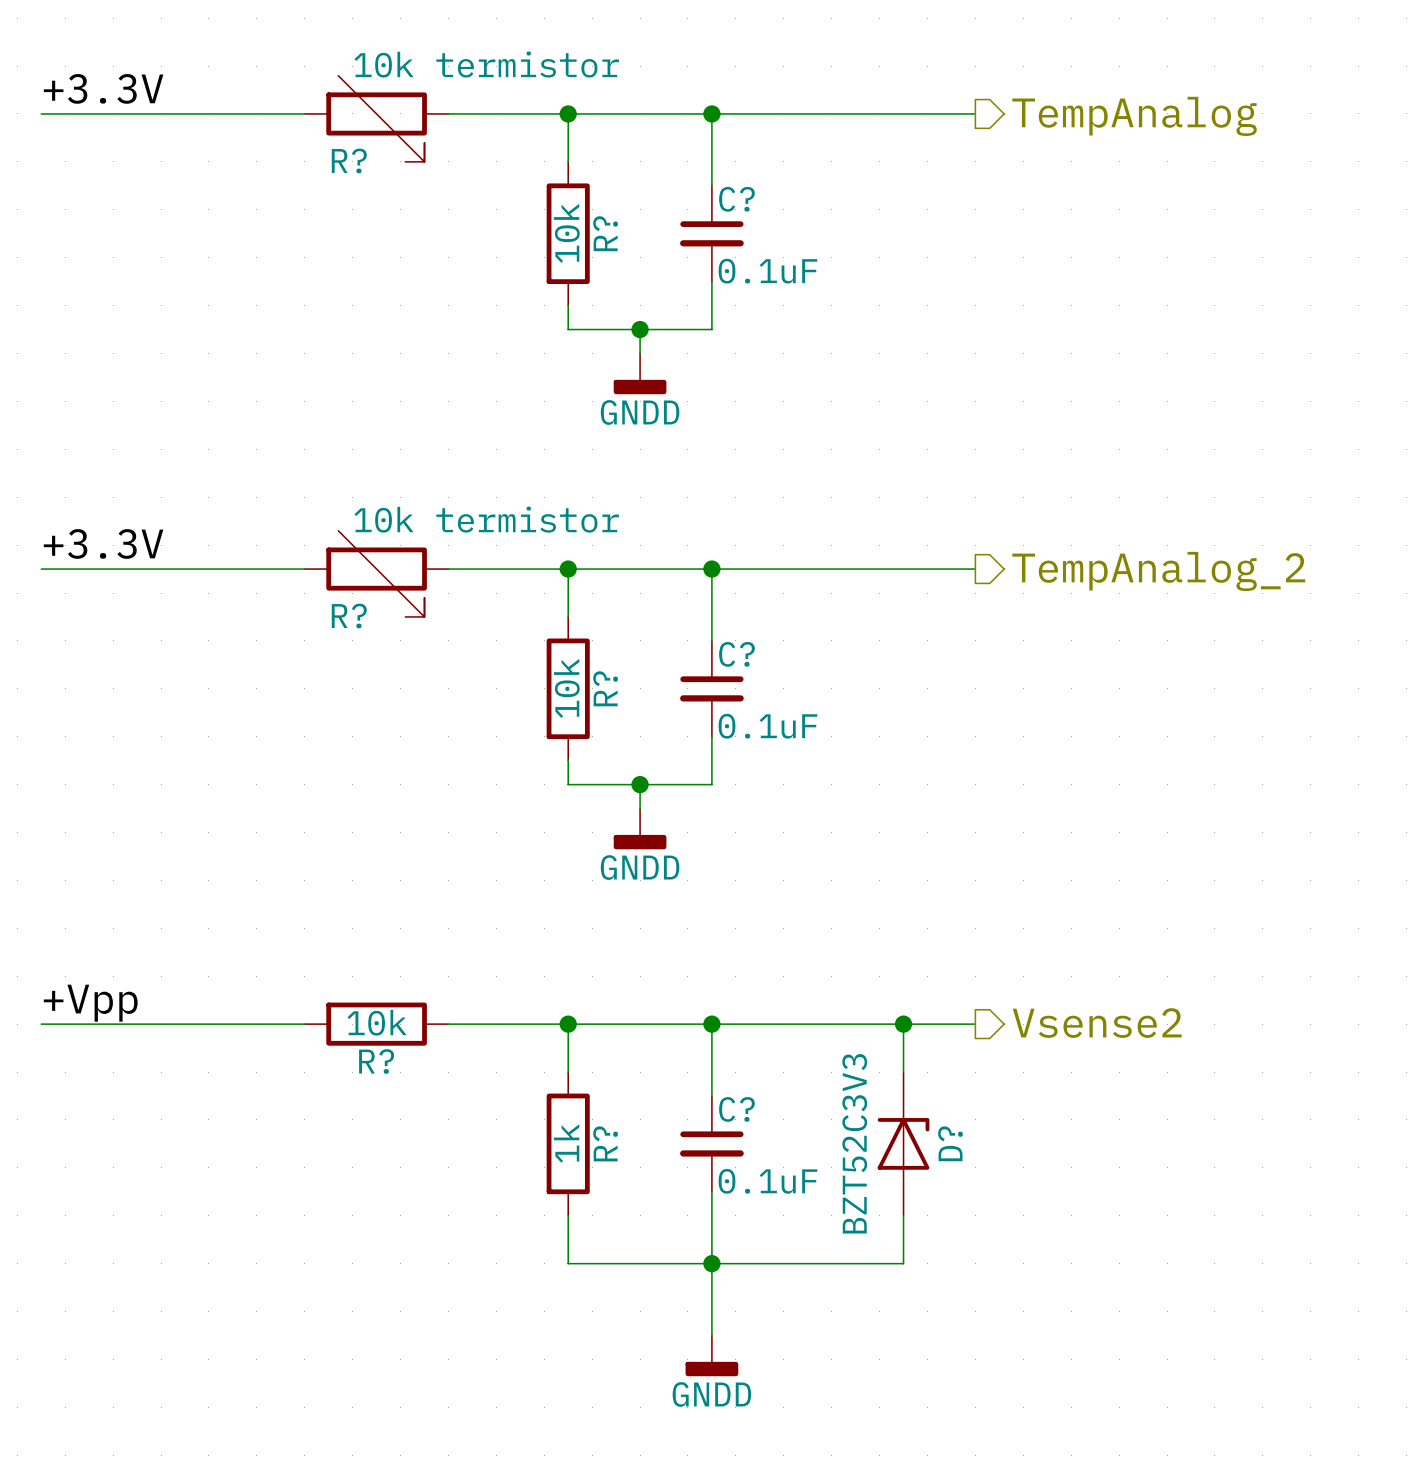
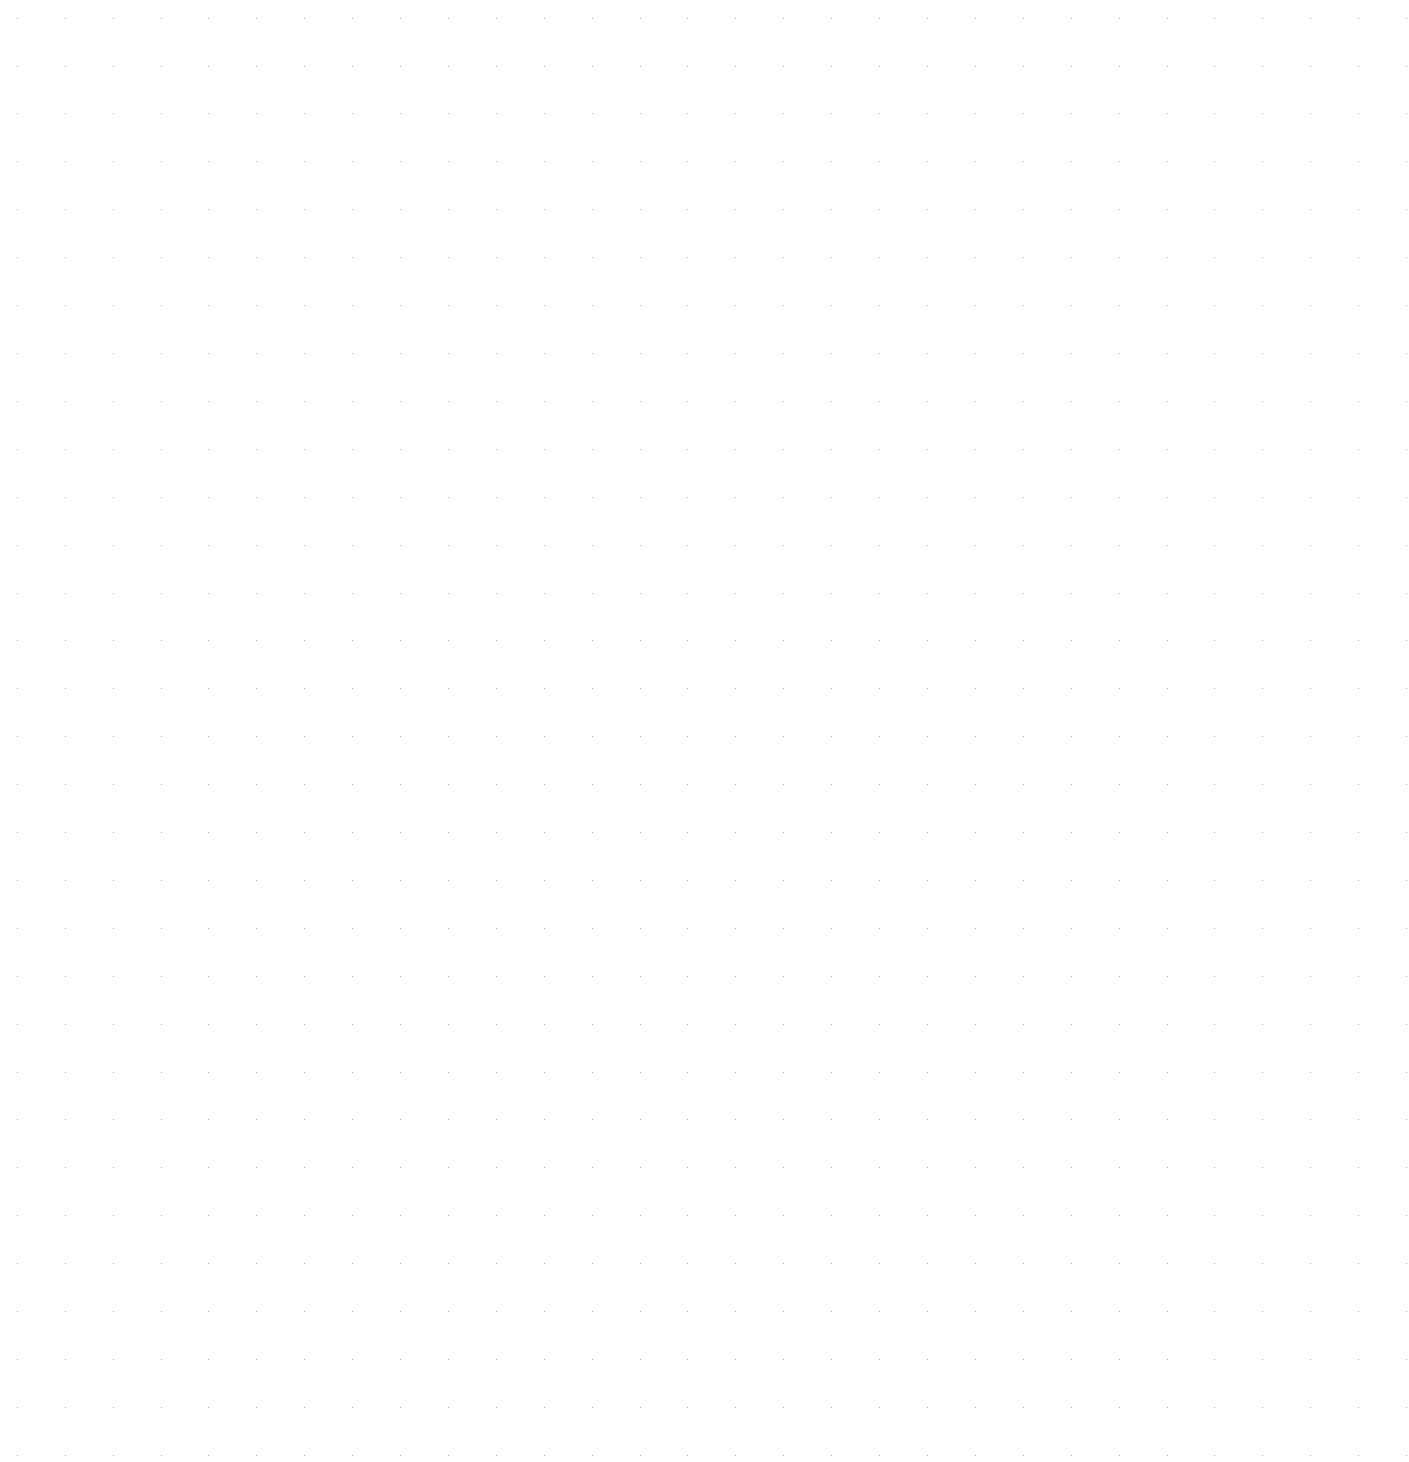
label: +3.3V (103, 88) -> none
wire: (41, 113) (304, 113) -> none
wire: (448, 113) (975, 113) -> none
wire: (568, 113) (568, 161) -> none
junction: (568, 113) -> none
wire: (711, 113) (711, 185) -> none
junction: (711, 113) -> none
hierarchical label: TempAnalog (1134, 116) -> none
R?: 10k termistor (376, 118) -> none
R?: 10k (568, 233) -> none
C?: 0.1uF (711, 233) -> none
wire: (711, 281) (711, 329) (568, 329) (568, 305) -> none
wire: (640, 329) (640, 353) -> none
junction: (640, 329) -> none
power symbol: GNDD (640, 373) -> none
label: +3.3V (103, 543) -> none
wire: (41, 569) (304, 569) -> none
wire: (448, 569) (975, 569) -> none
wire: (568, 569) (568, 616) -> none
junction: (568, 569) -> none
wire: (711, 569) (711, 640) -> none
junction: (711, 569) -> none
hierarchical label: TempAnalog_2 (1158, 571) -> none
R?: 10k termistor (376, 573) -> none
R?: 10k (568, 688) -> none
C?: 0.1uF (711, 688) -> none
wire: (711, 736) (711, 784) (568, 784) (568, 760) -> none
wire: (640, 784) (640, 808) -> none
junction: (640, 784) -> none
power symbol: GNDD (640, 828) -> none
label: +Vpp (90, 1003) -> none
hierarchical label: Vsense2 (1097, 1023) -> none
wire: (41, 1024) (304, 1024) -> none
R?: 10k (376, 1024) -> none
wire: (448, 1024) (975, 1024) -> none
wire: (568, 1024) (568, 1072) -> none
junction: (568, 1024) -> none
wire: (711, 1024) (711, 1095) -> none
junction: (711, 1024) -> none
wire: (903, 1024) (903, 1072) -> none
junction: (903, 1024) -> none
R?: 1k (568, 1143) -> none
C?: 0.1uF (711, 1143) -> none
D?: BZT52C3V3 (903, 1143) -> none
wire: (711, 1191) (711, 1335) -> none
wire: (568, 1215) (568, 1263) (903, 1263) (903, 1215) -> none
junction: (711, 1263) -> none
power symbol: GNDD (711, 1355) -> none

